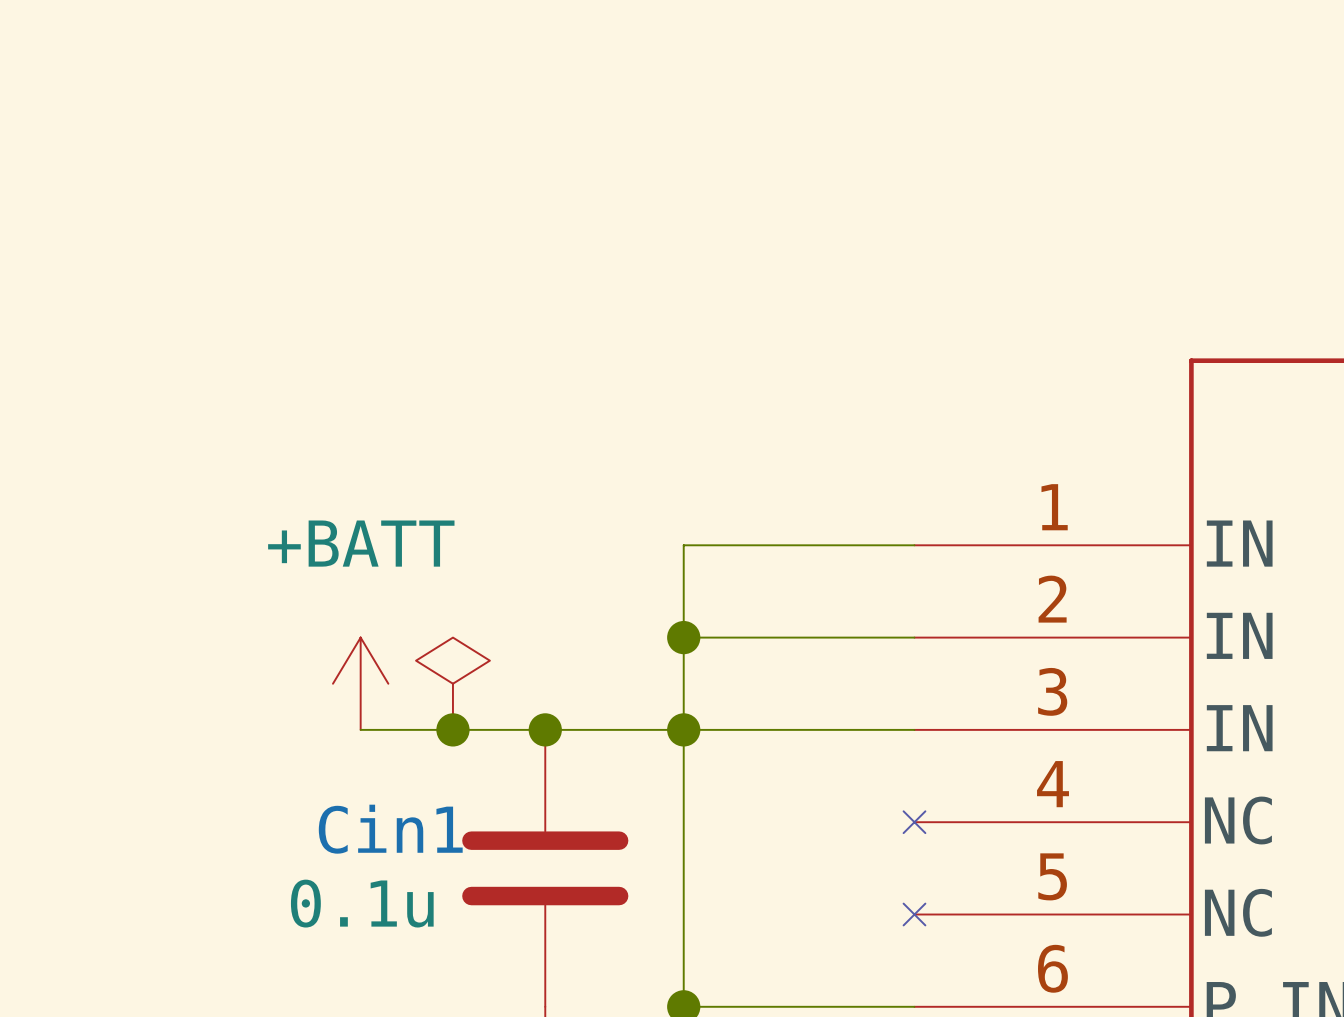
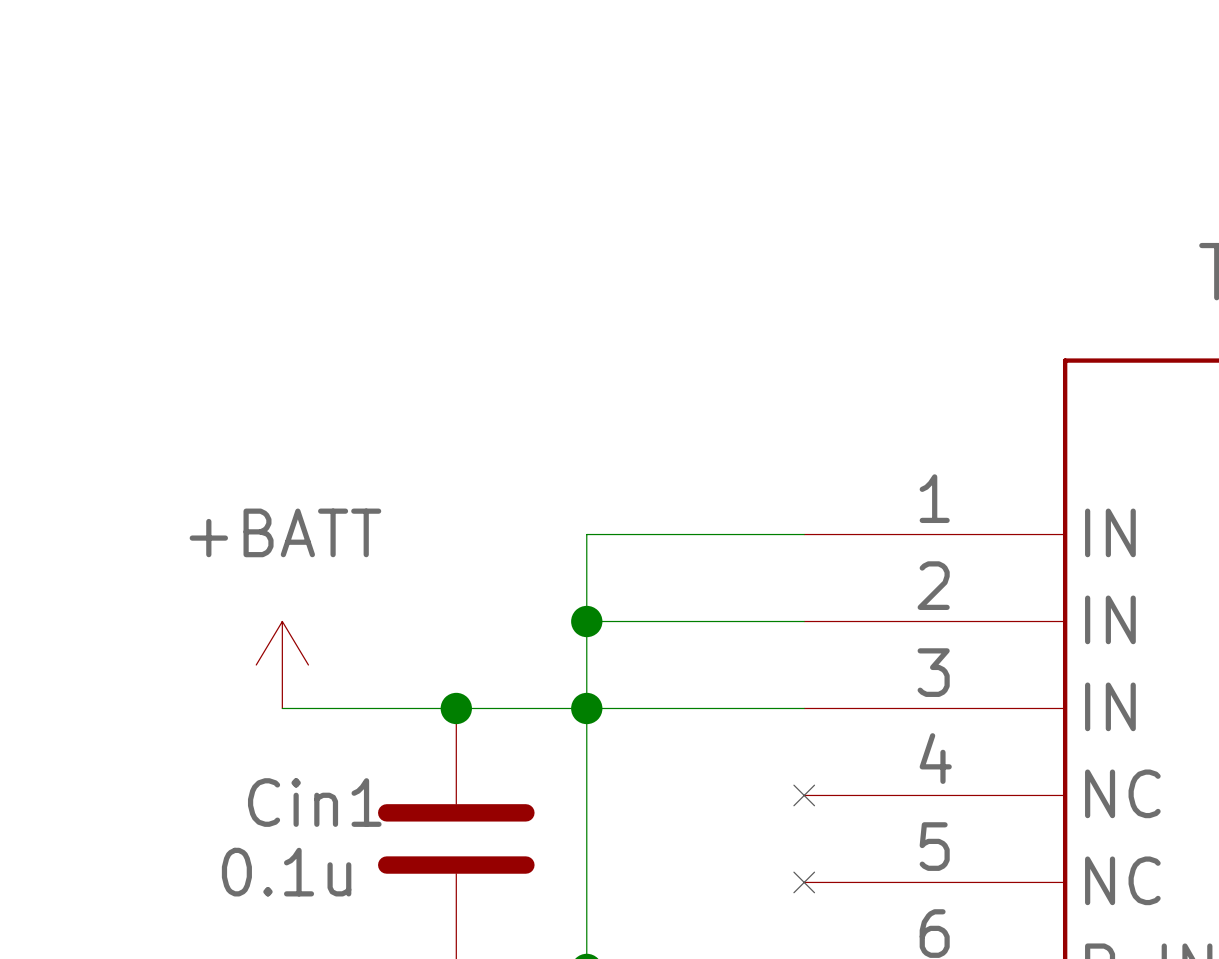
power symbol: (452, 683) -> none
junction: (452, 729) -> none

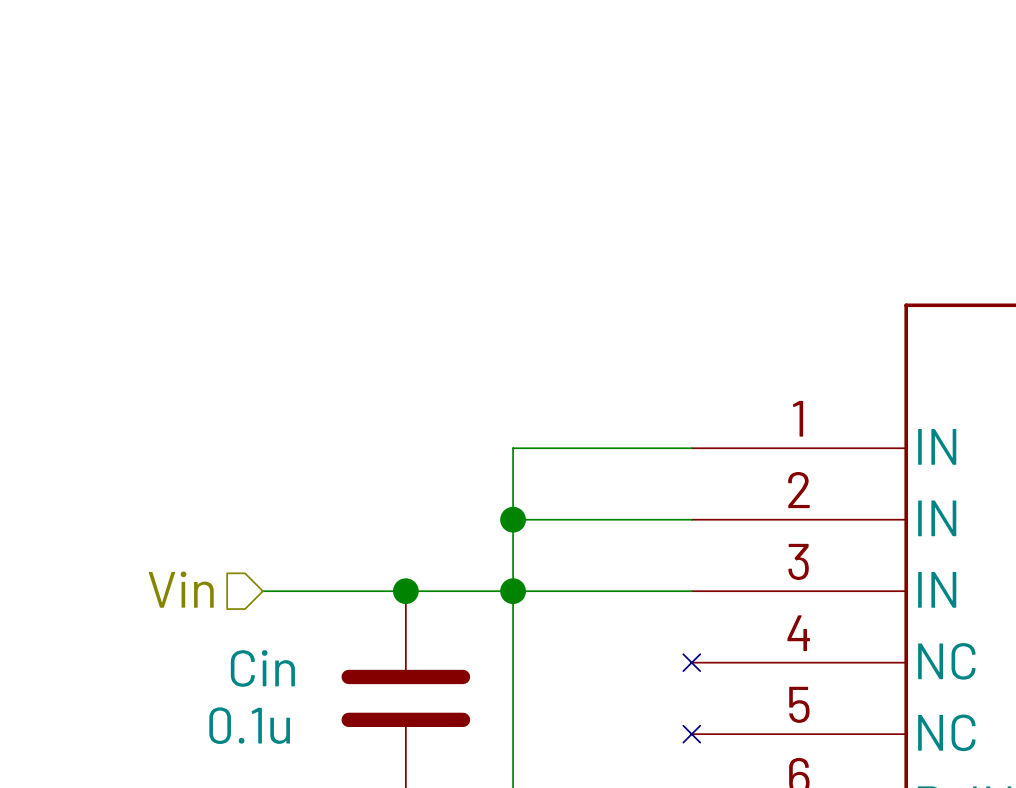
power symbol: +BATT (282, 664) -> none
hierarchical label: none -> Vin (181, 589)
Cin1 name: Cin1 (314, 802) -> Cin (262, 668)

